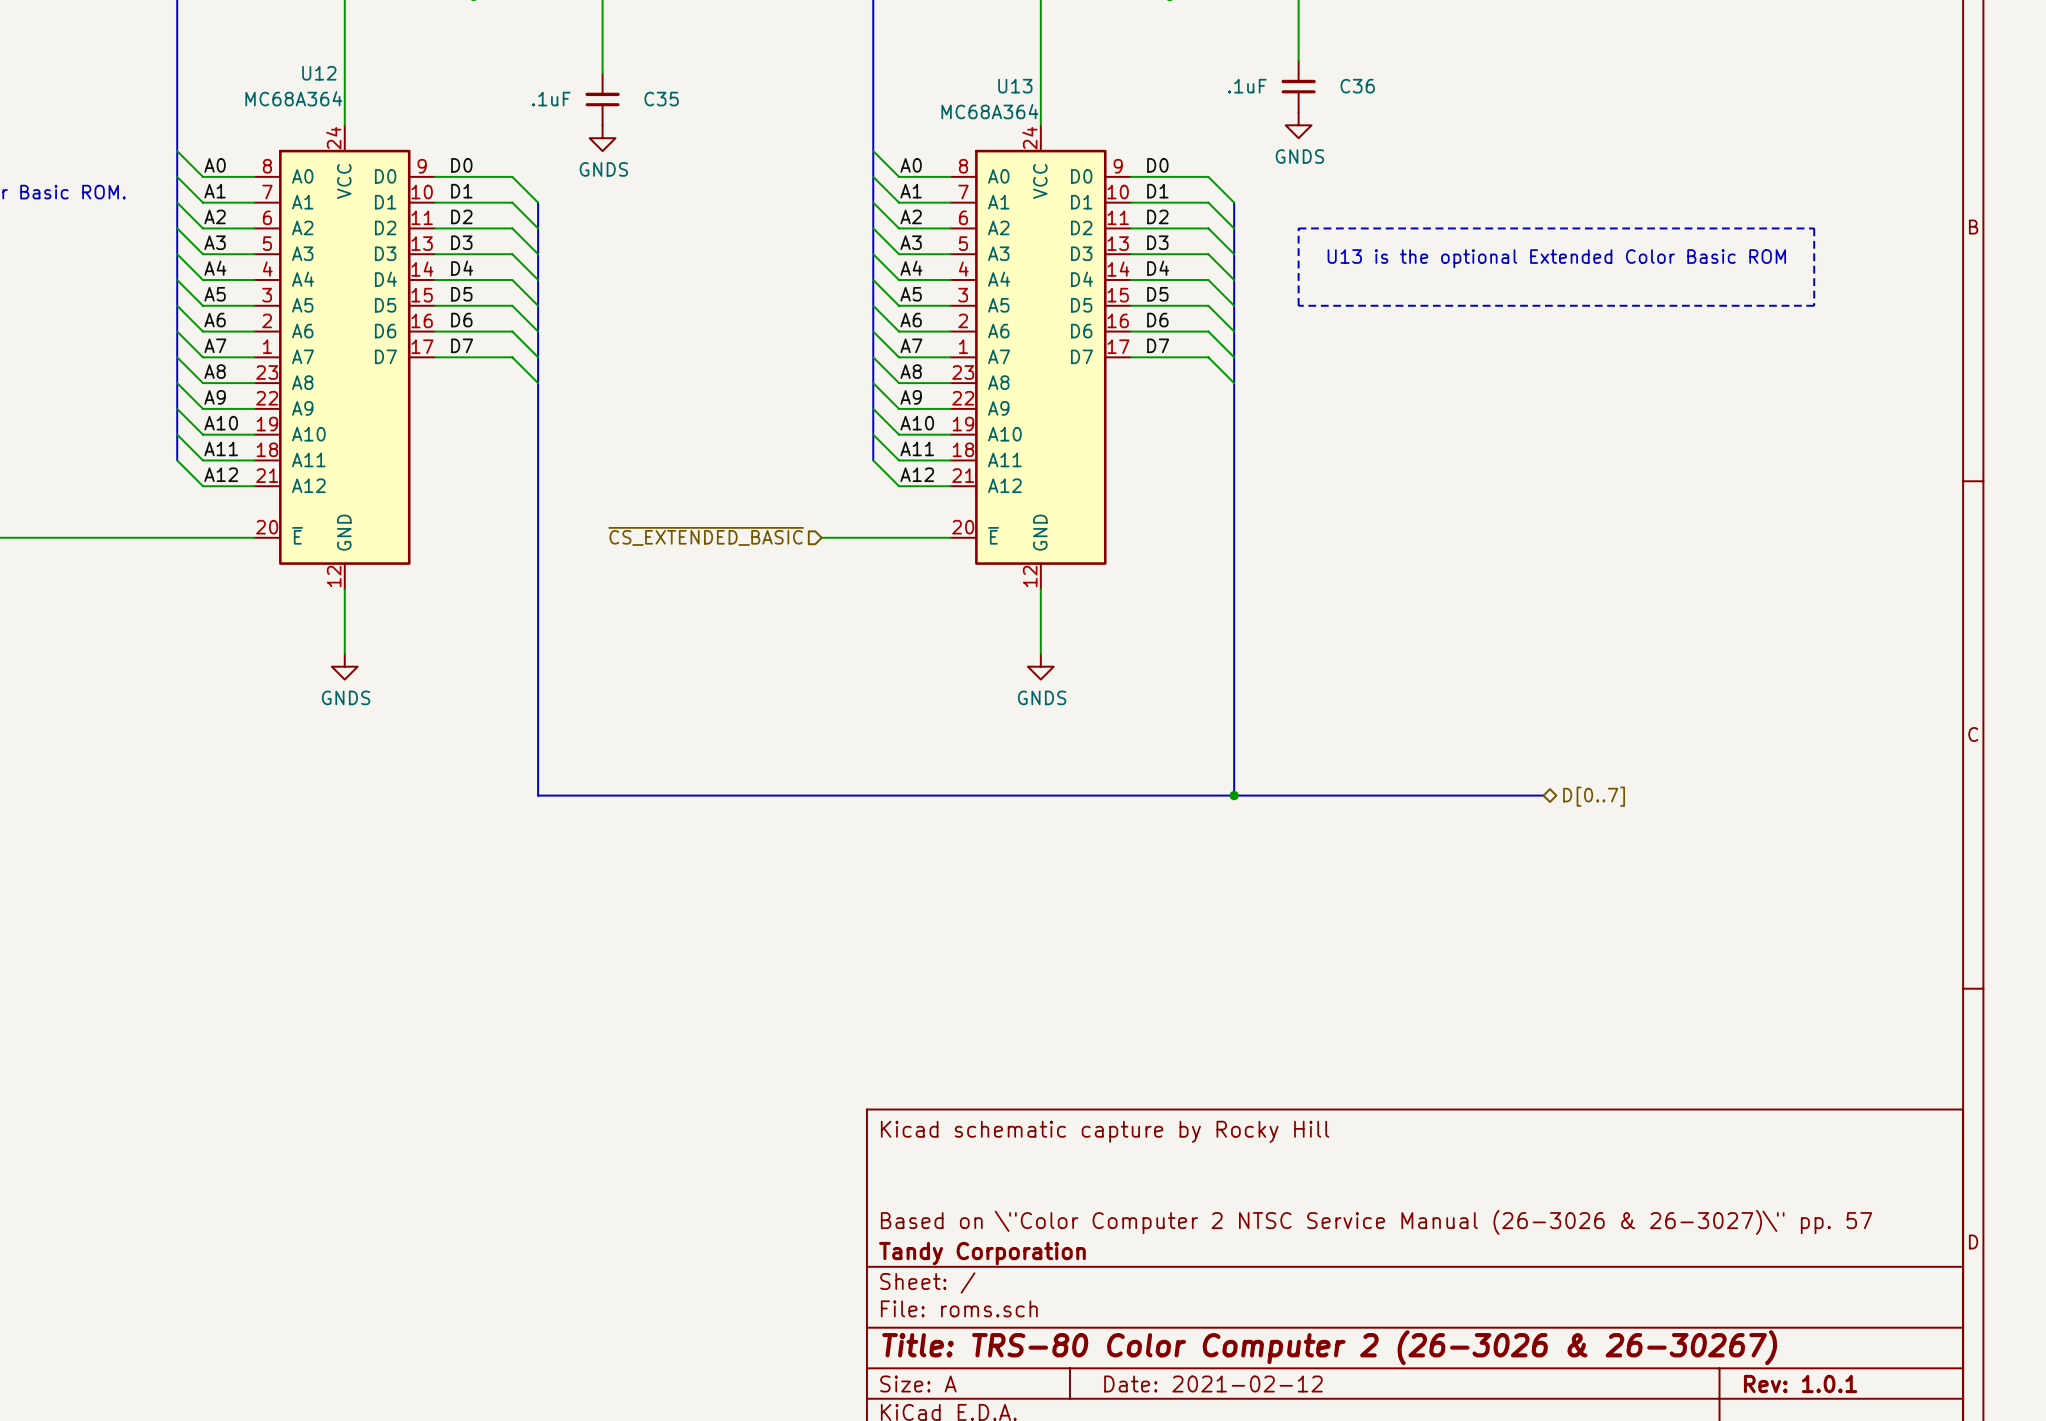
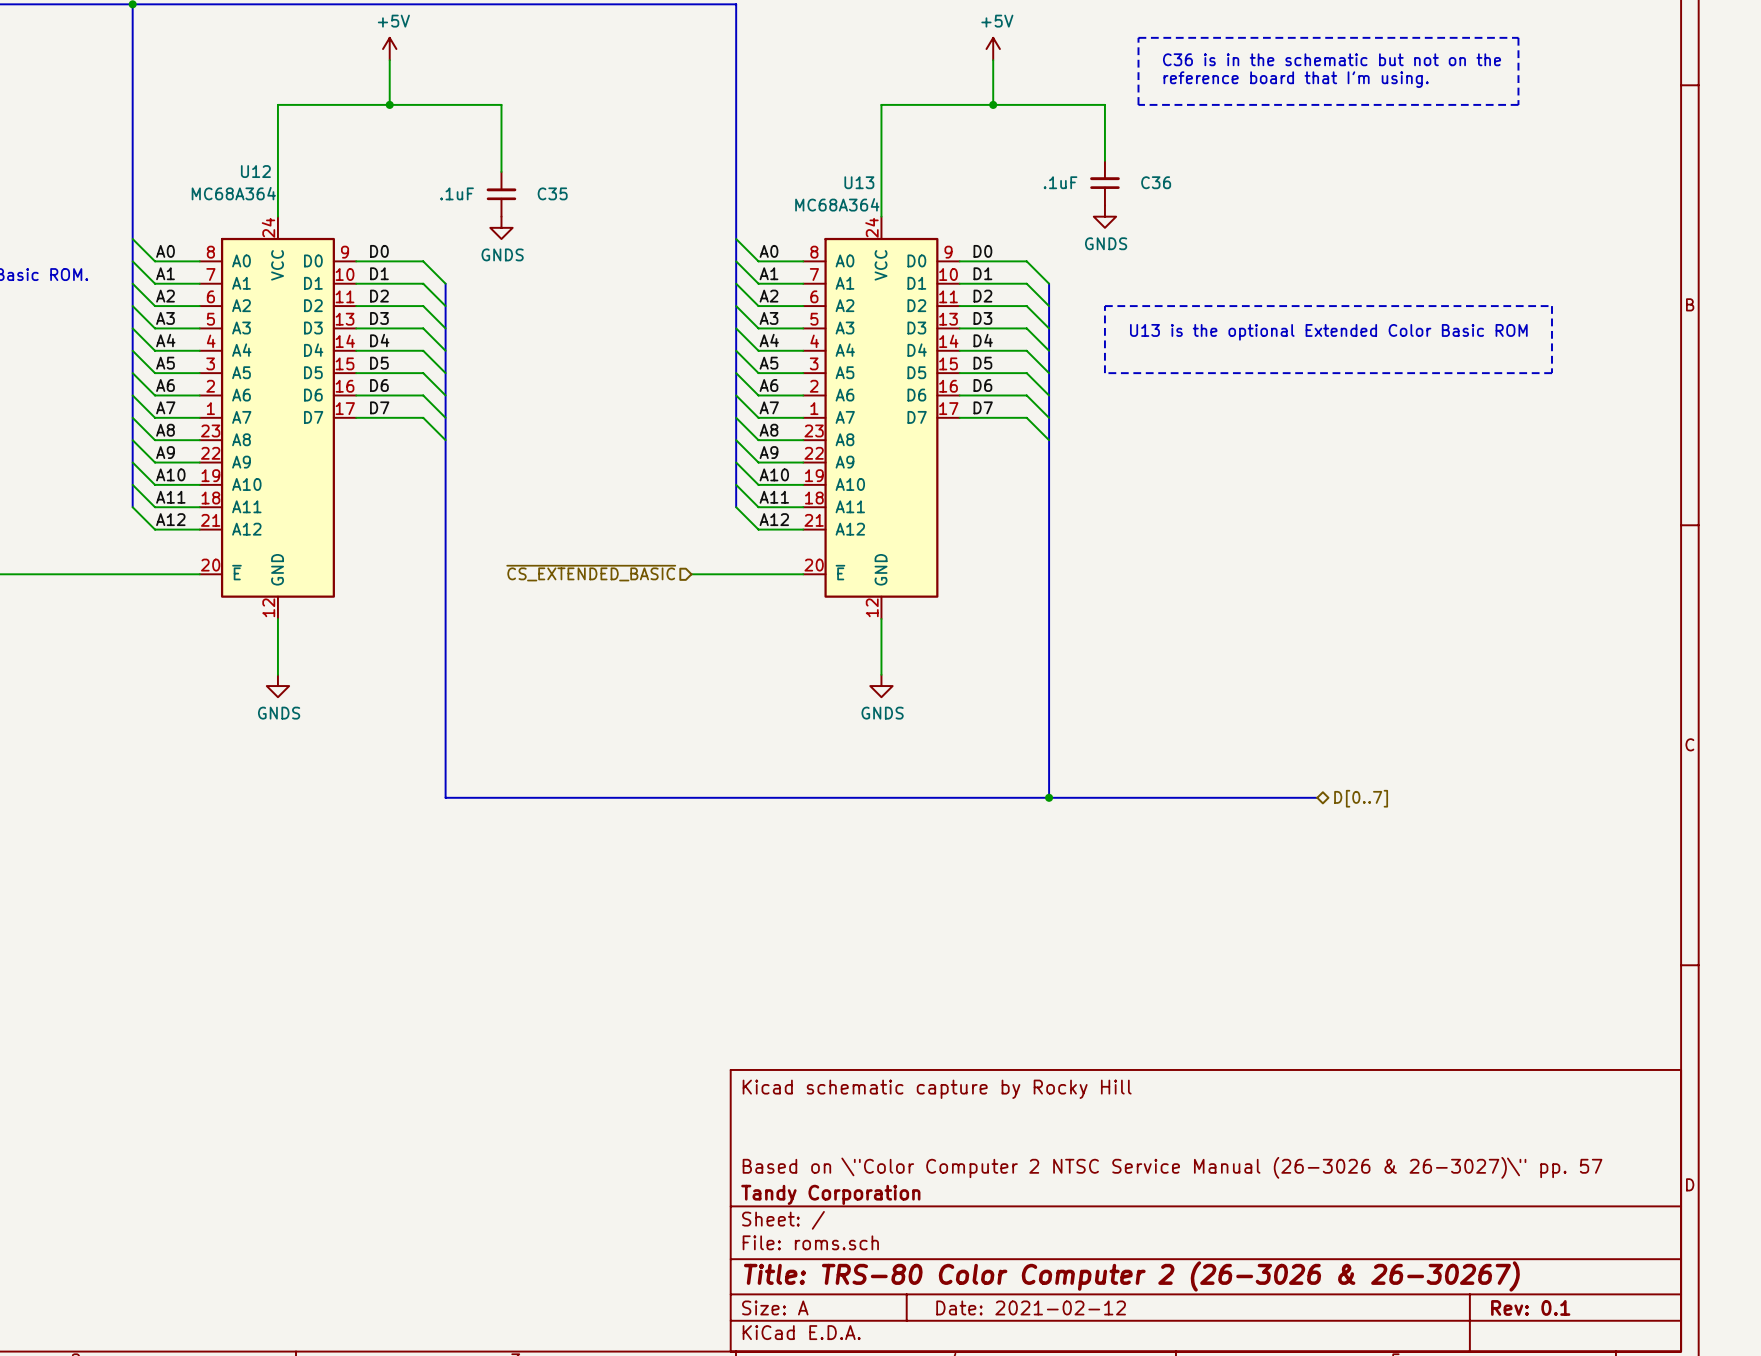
title block: Rev: 1.0.1 (1800, 1383) -> Rev: 0.1 (1530, 1307)

